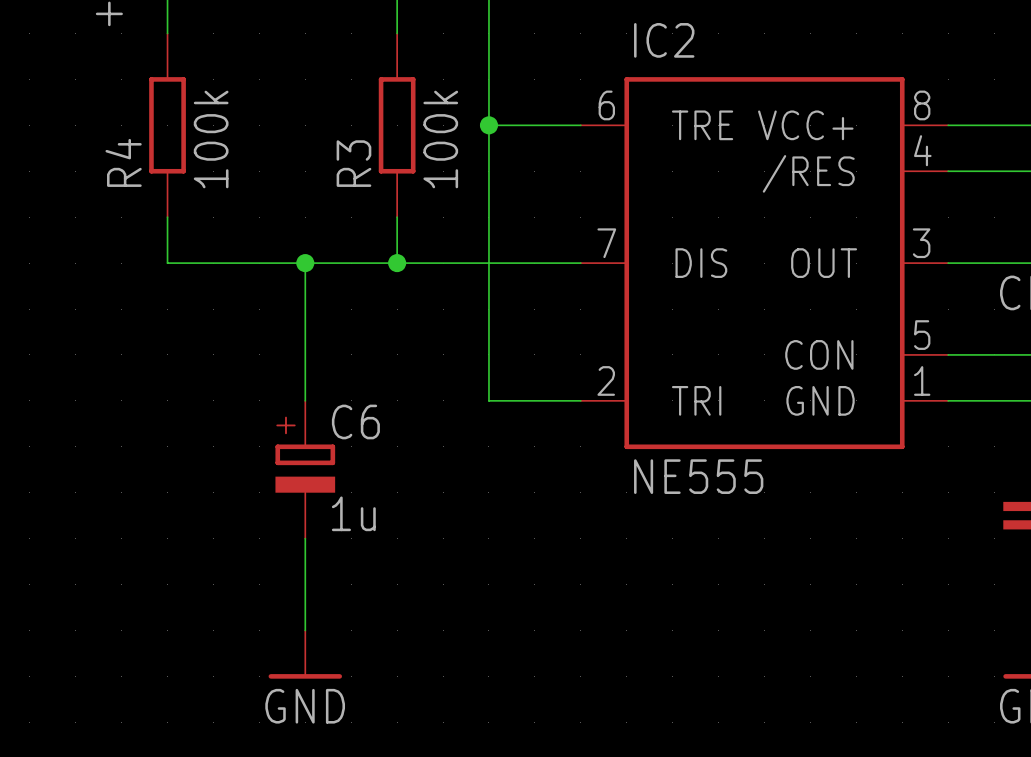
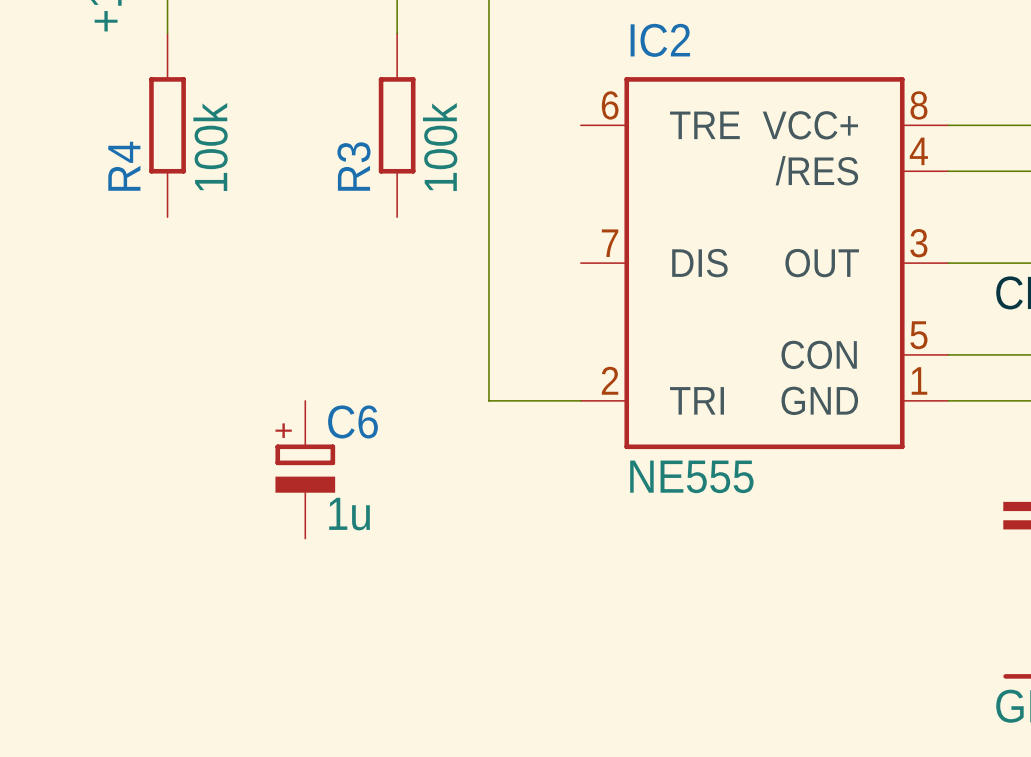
wire: (488, 125) (580, 125) -> none
junction: (488, 125) -> none
wire: (167, 217) (167, 263) (580, 263) -> none
wire: (397, 217) (397, 263) -> none
wire: (305, 263) (305, 400) -> none
junction: (305, 263) -> none
junction: (397, 263) -> none
wire: (305, 538) (305, 630) -> none
power symbol: GND (305, 654) -> none

